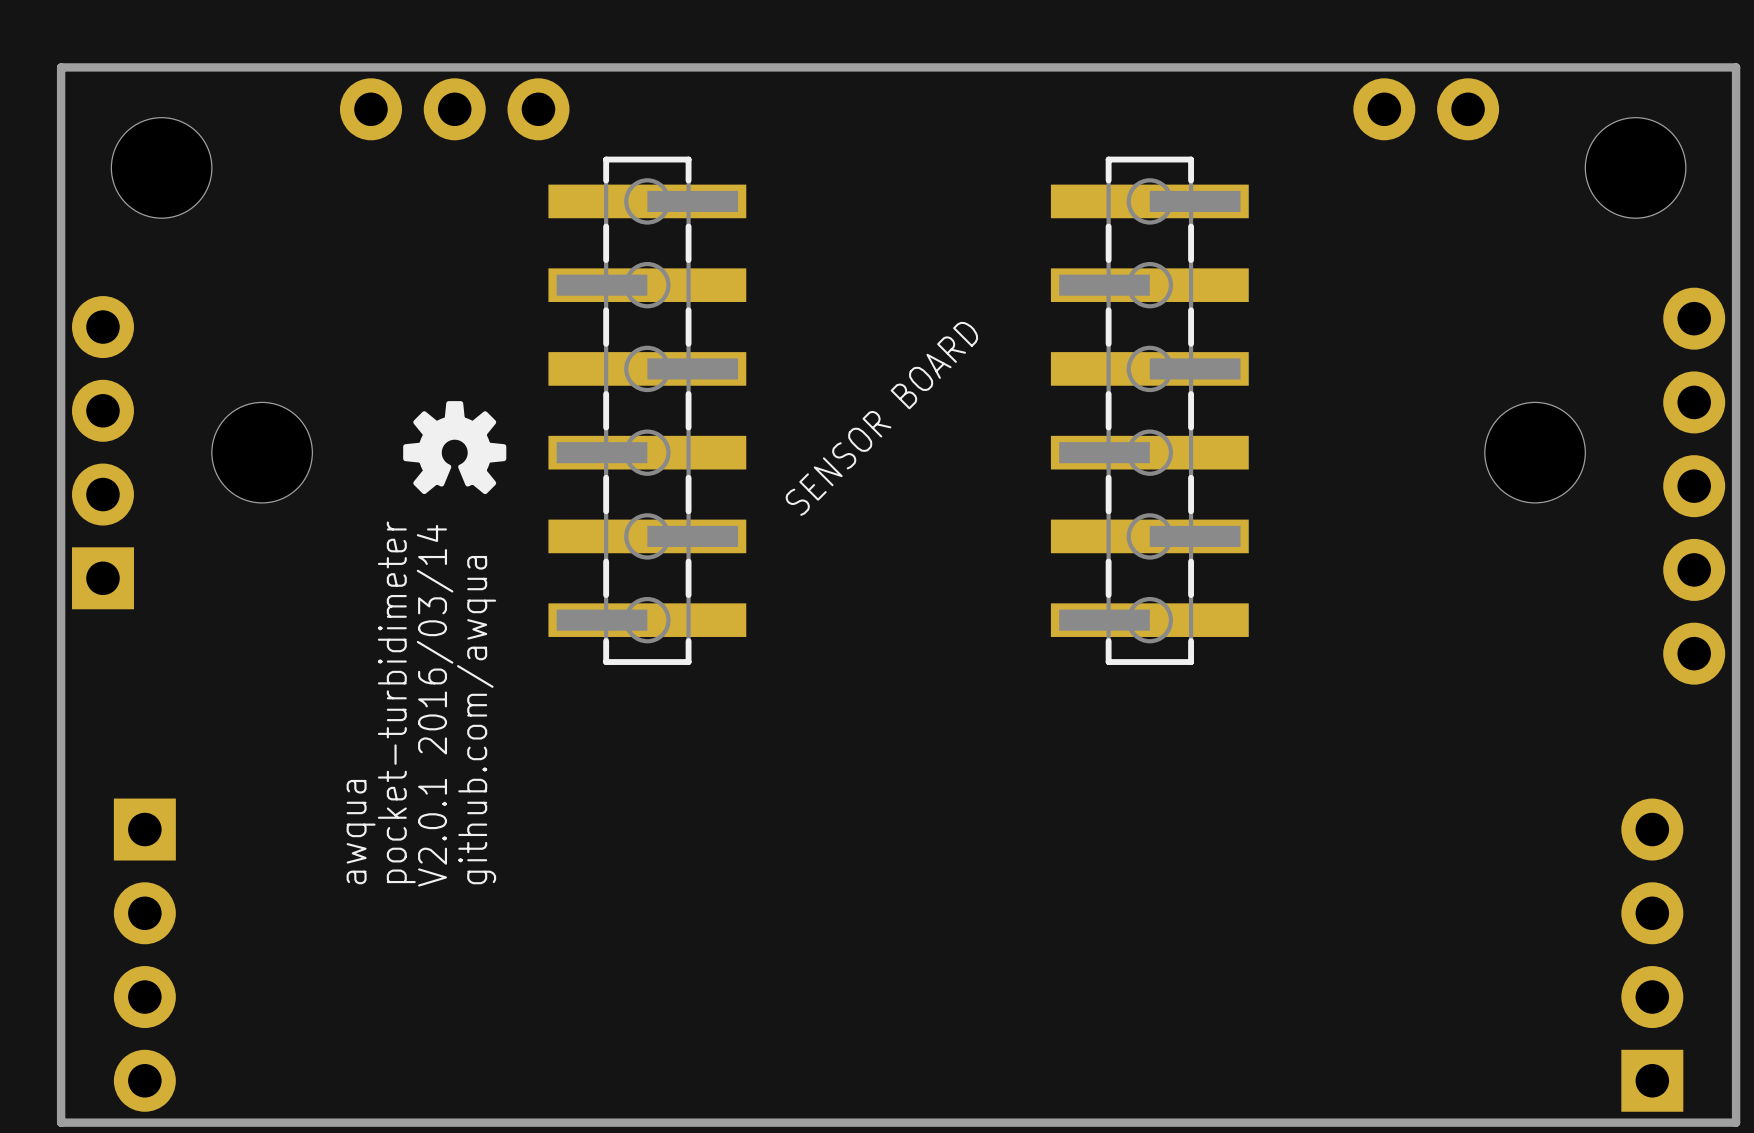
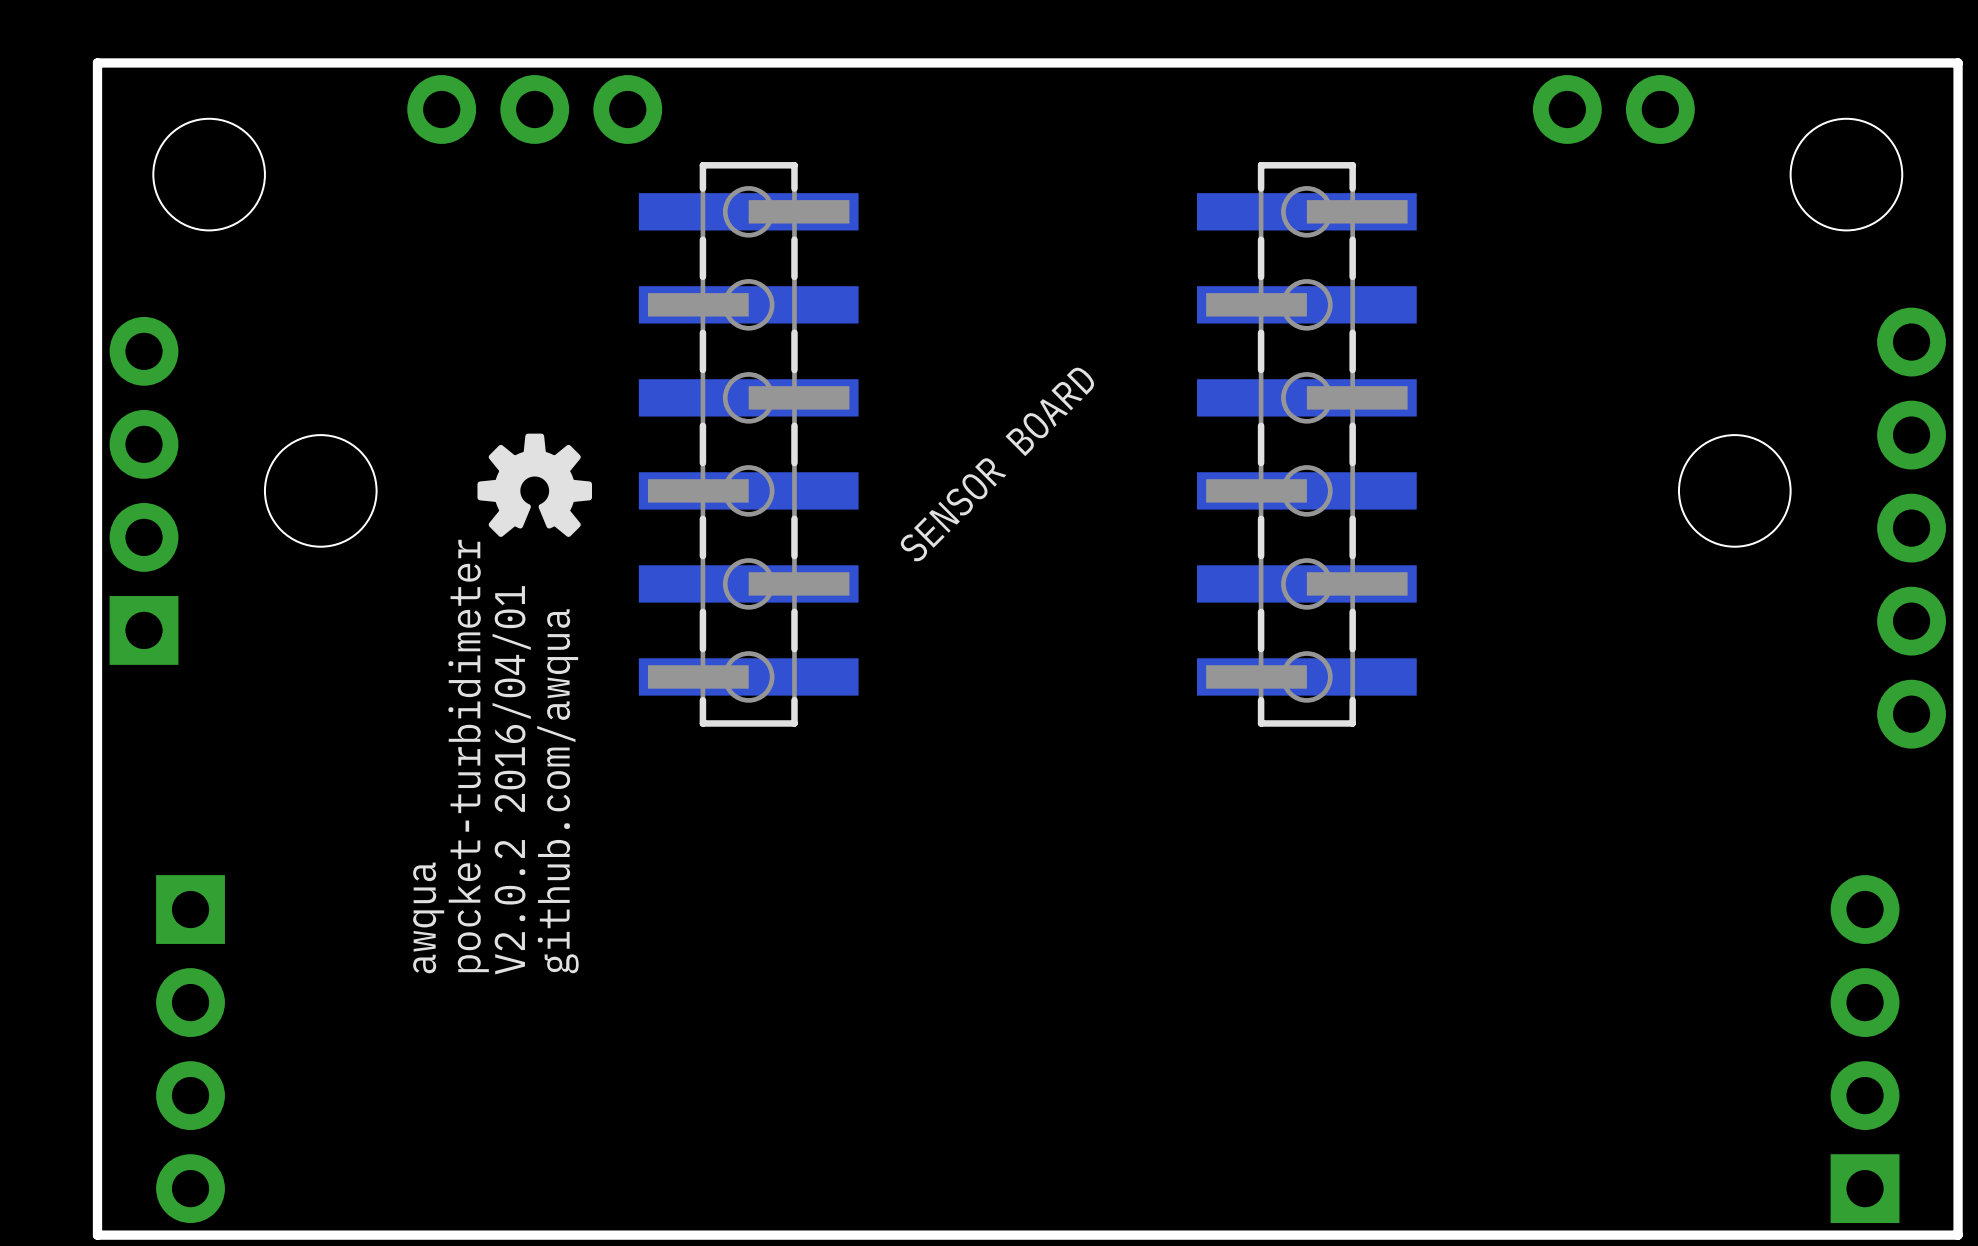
text: V2.0.1 2016/03/14 (435, 705) -> V2.0.2 2016/04/01 (511, 780)

